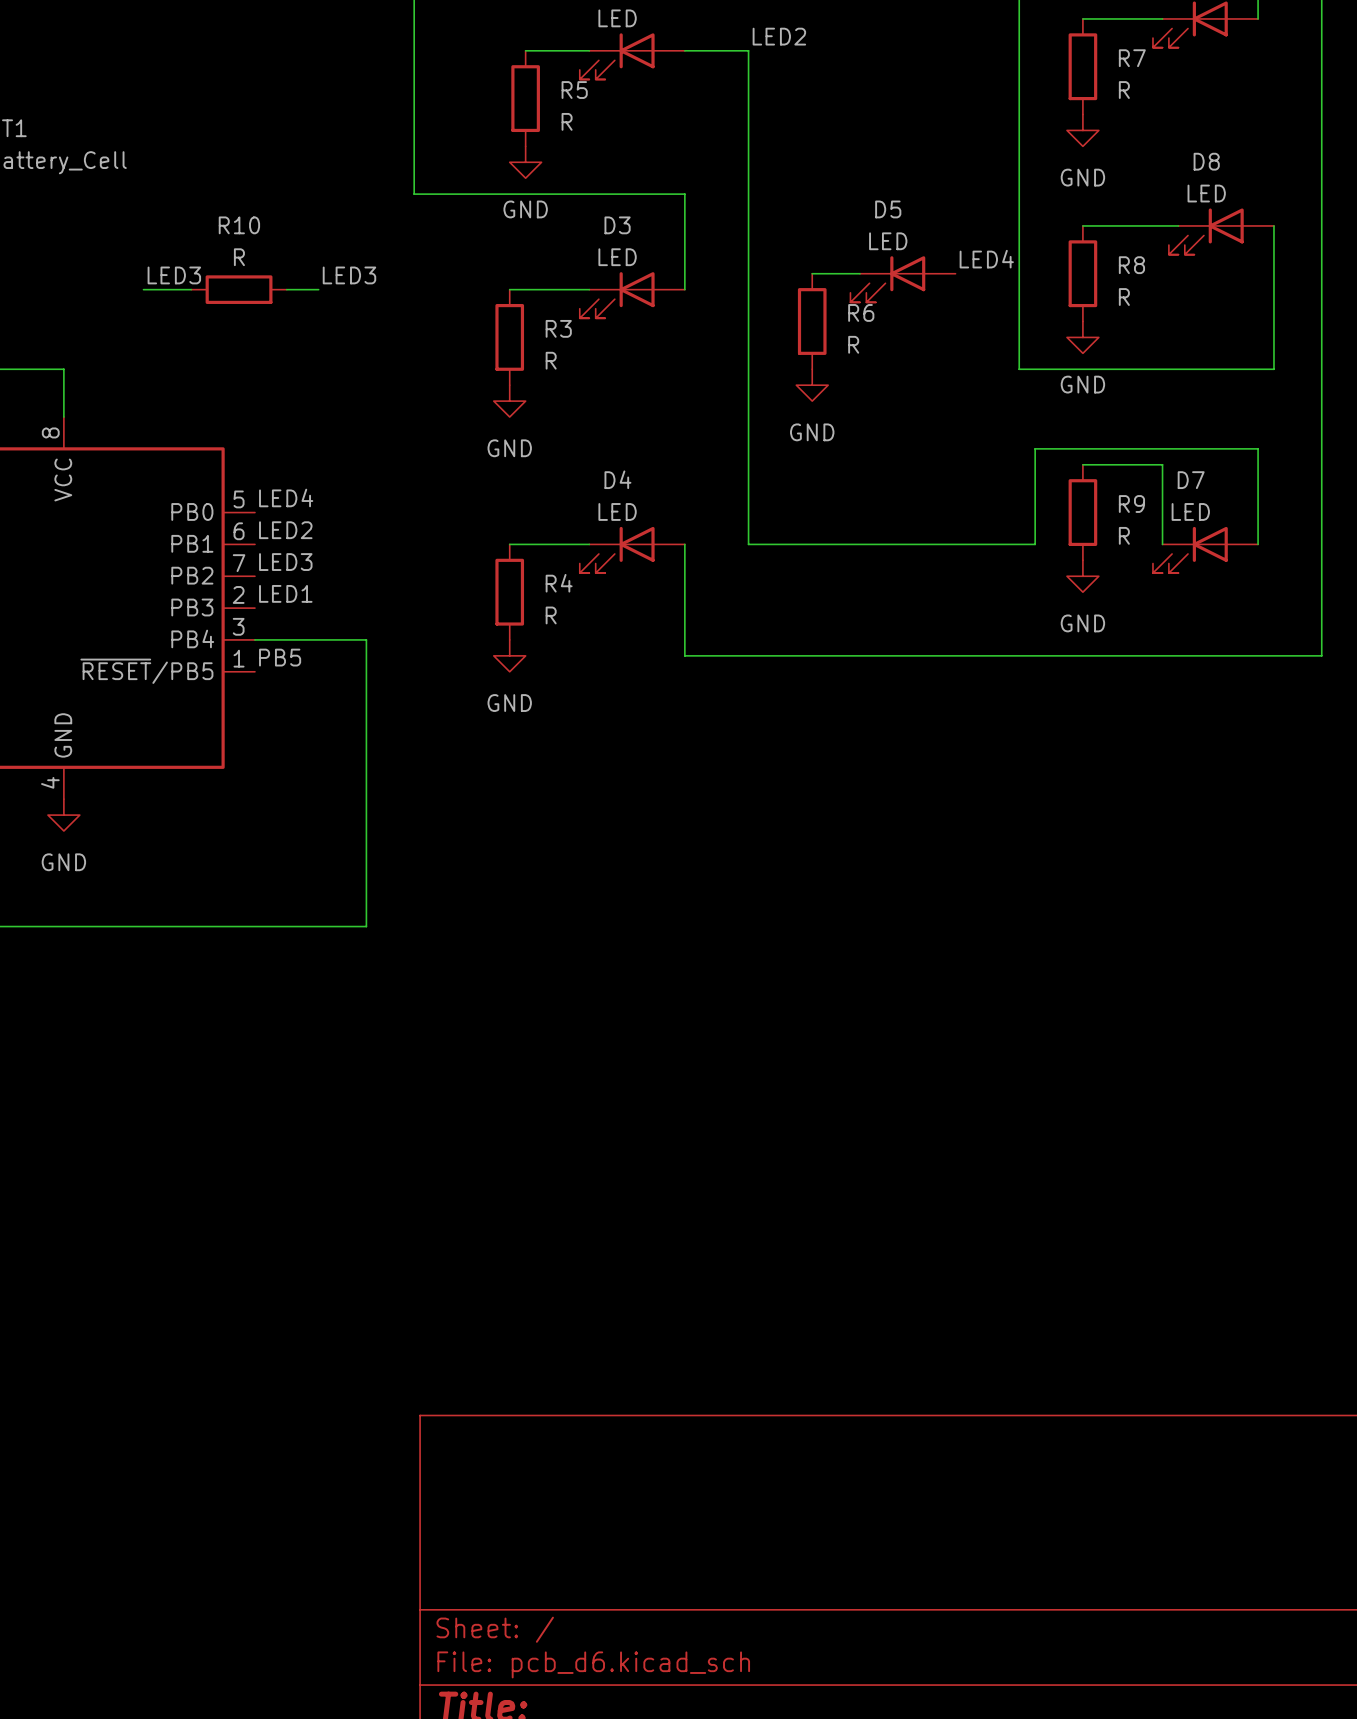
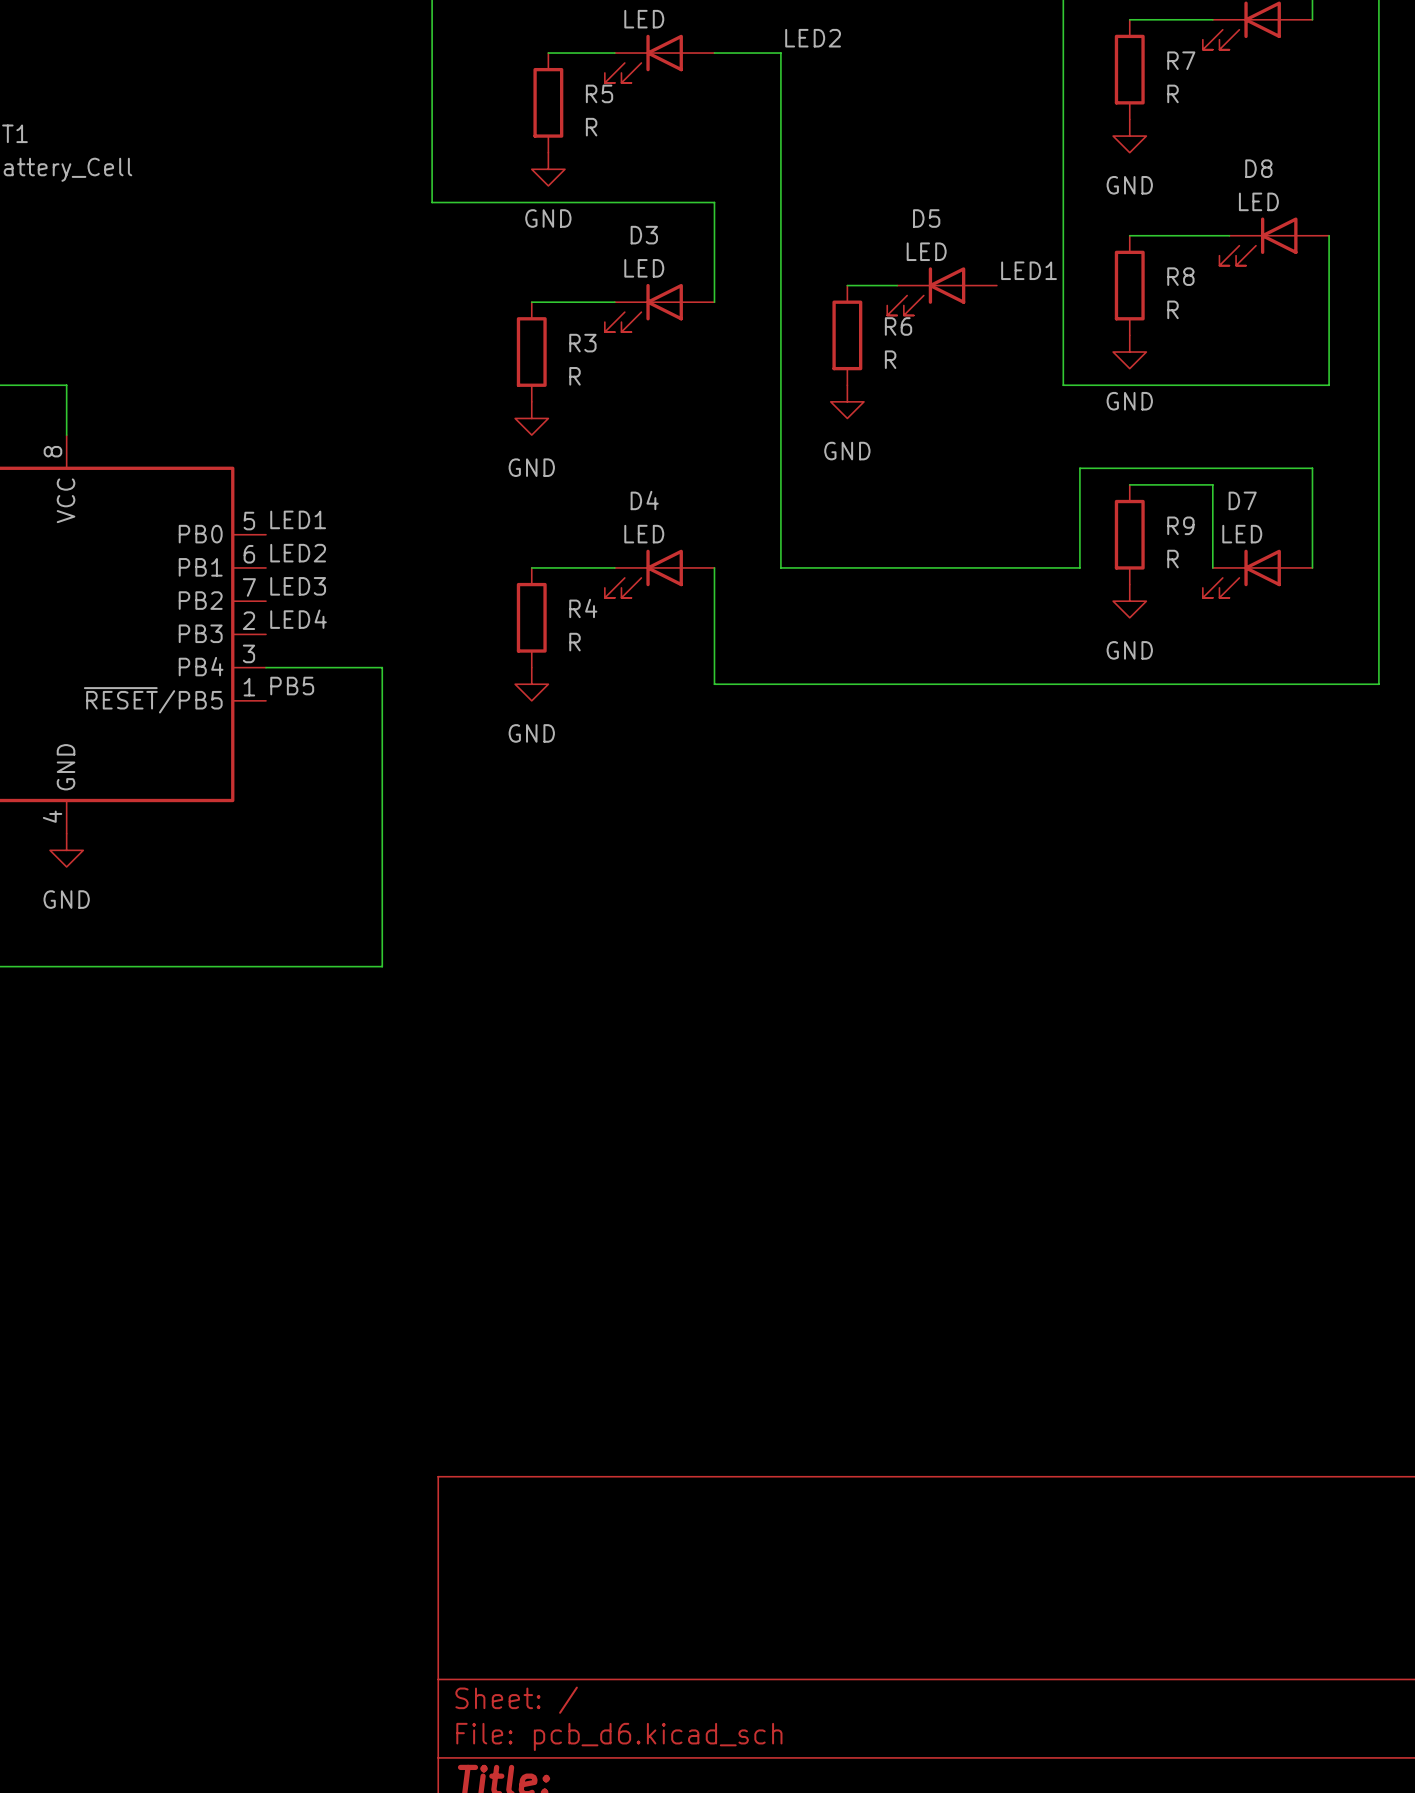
label: LED4 (986, 259) -> LED1 (1029, 270)
label: LED3 (174, 275) -> none
label: LED3 (349, 275) -> none
wire: (143, 289) (191, 289) -> none
R10: R (239, 289) -> none
wire: (286, 289) (318, 289) -> none
label: LED4 (286, 497) -> LED1 (298, 519)
label: LED1 (285, 593) -> LED4 (298, 619)

